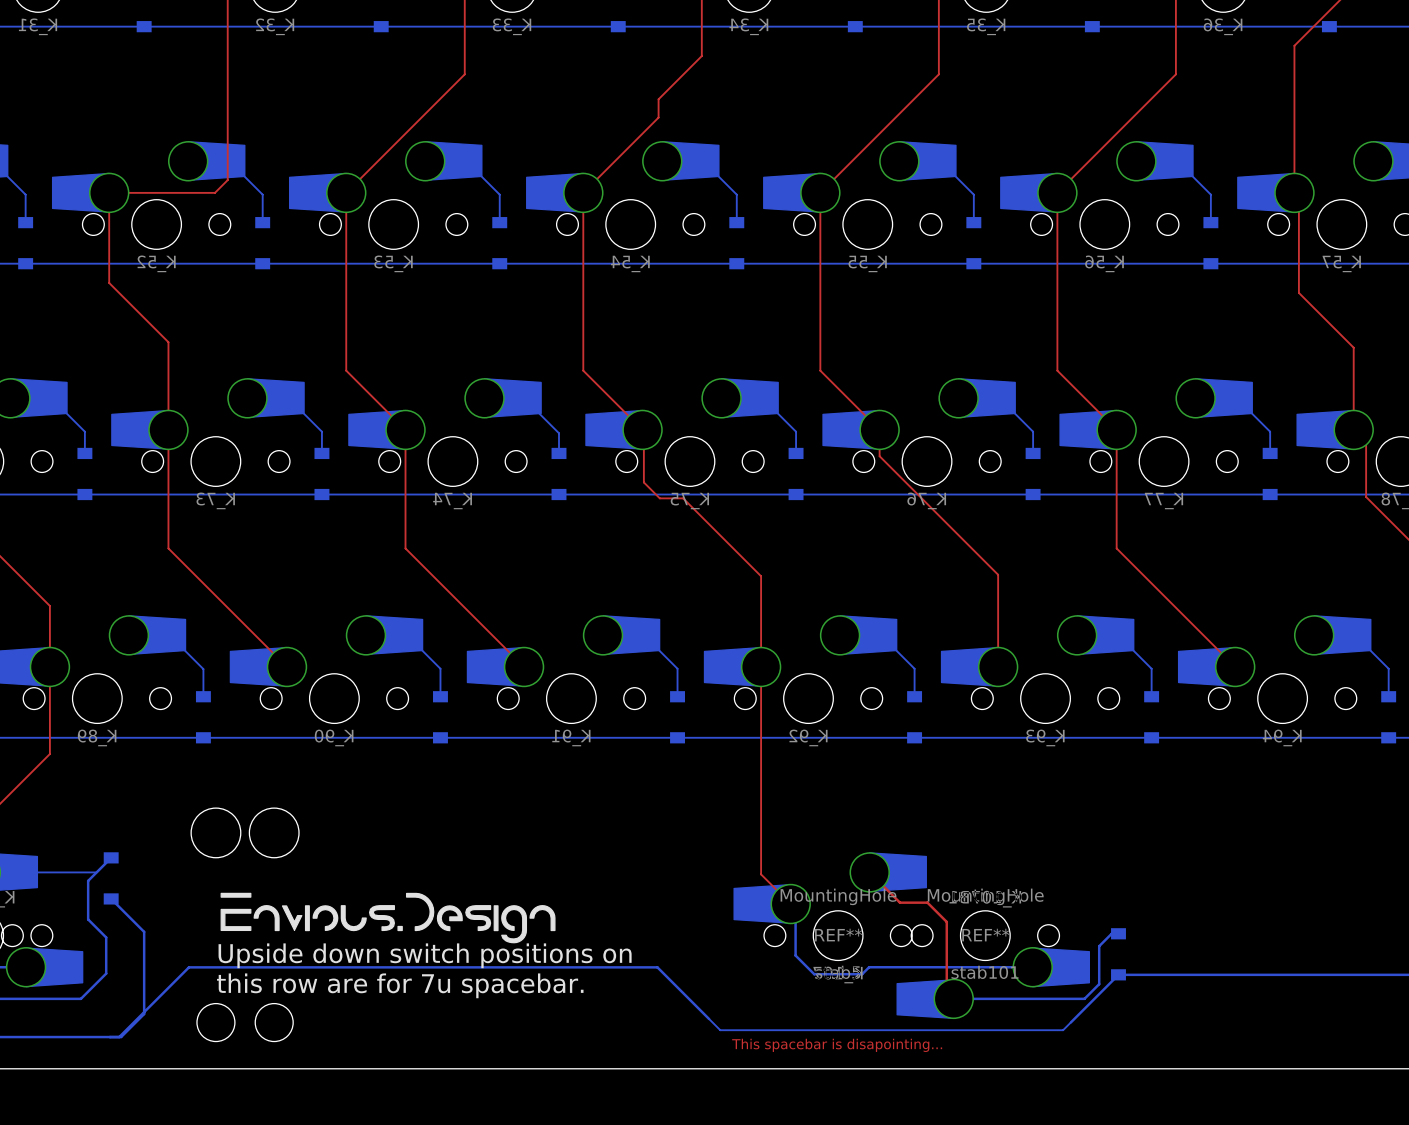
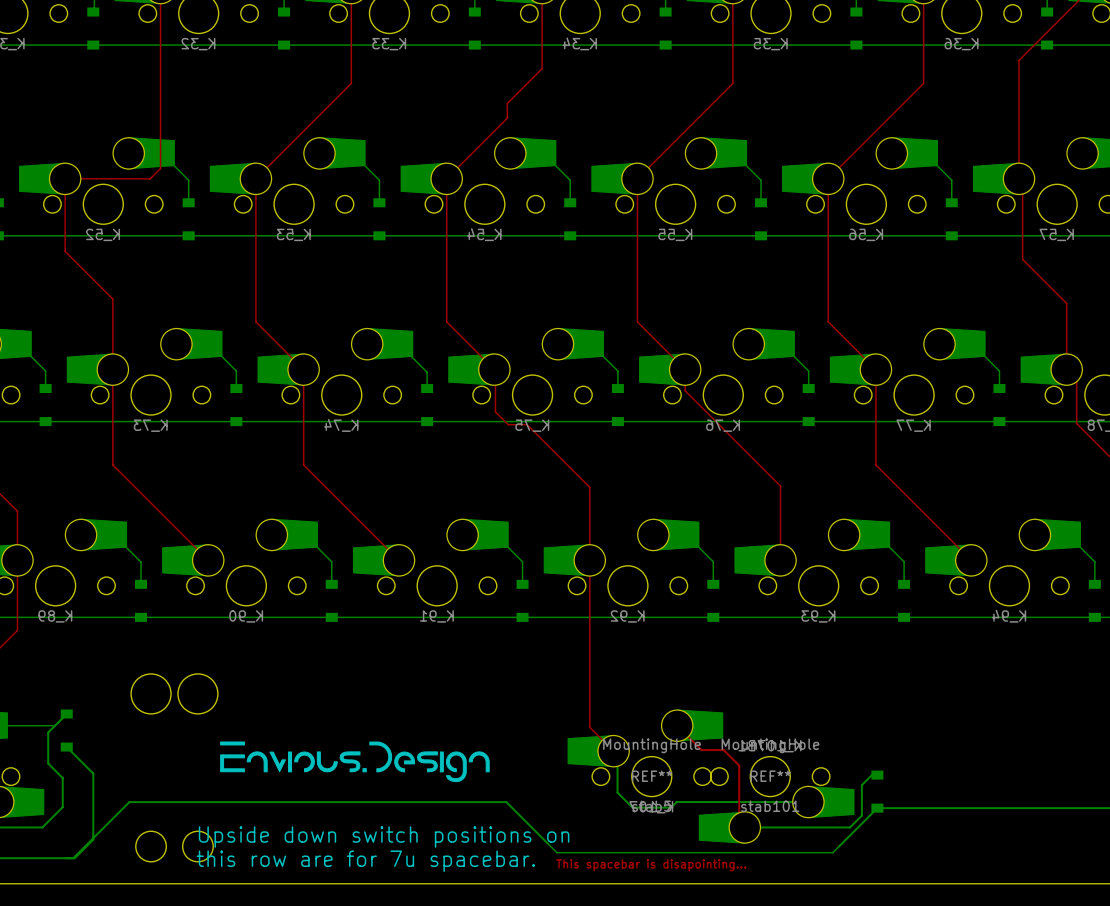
drawing position: (388, 918) -> (354, 761)
text position: Upside down switch positions on (425, 955) -> Upside down switch positions on (384, 837)
text position: this row are for 7u spacebar. (400, 985) -> this row are for 7u spacebar. (365, 861)

